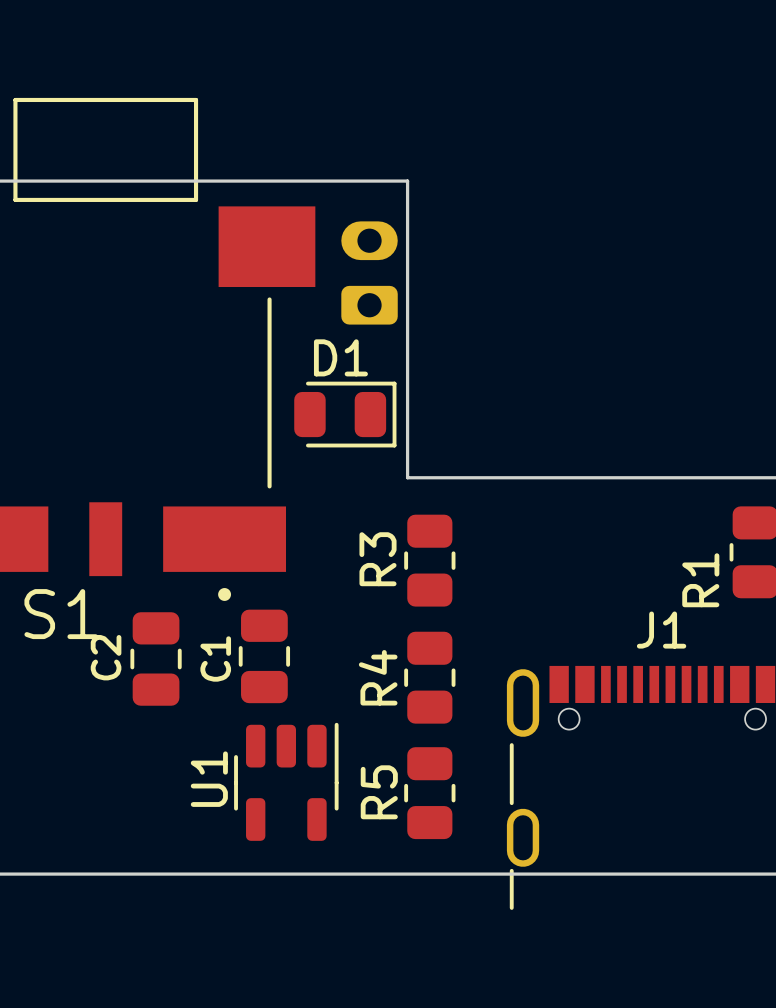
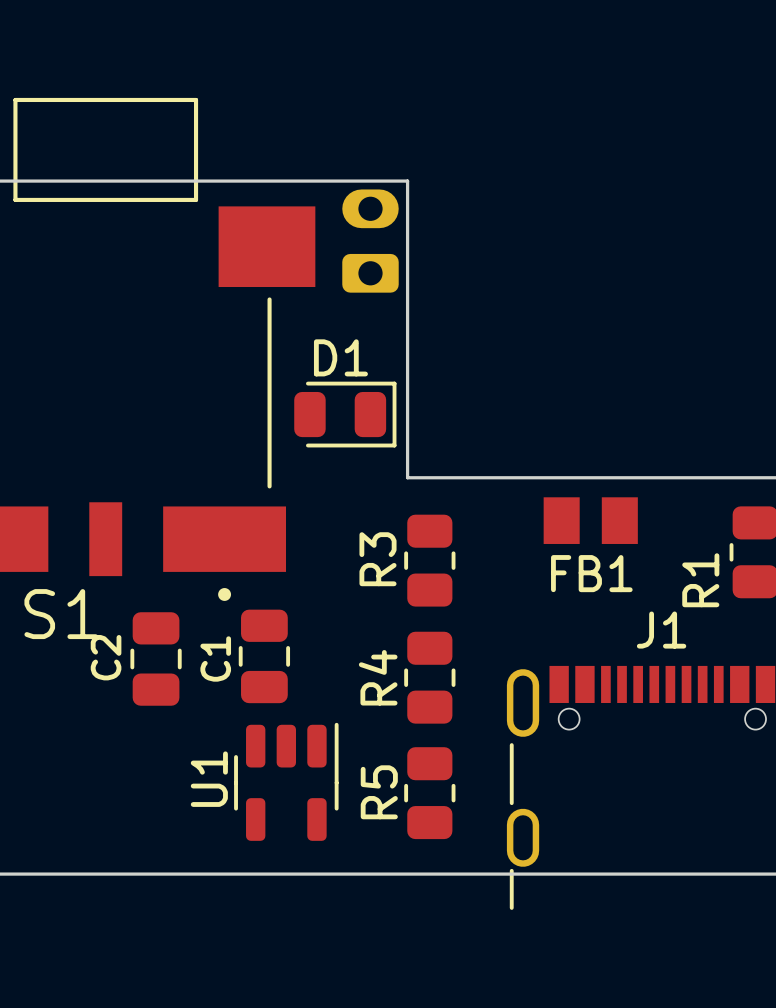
part position: (369, 240) -> (370, 208)
part position: (369, 305) -> (370, 273)
FB1: none -> (590, 520)

